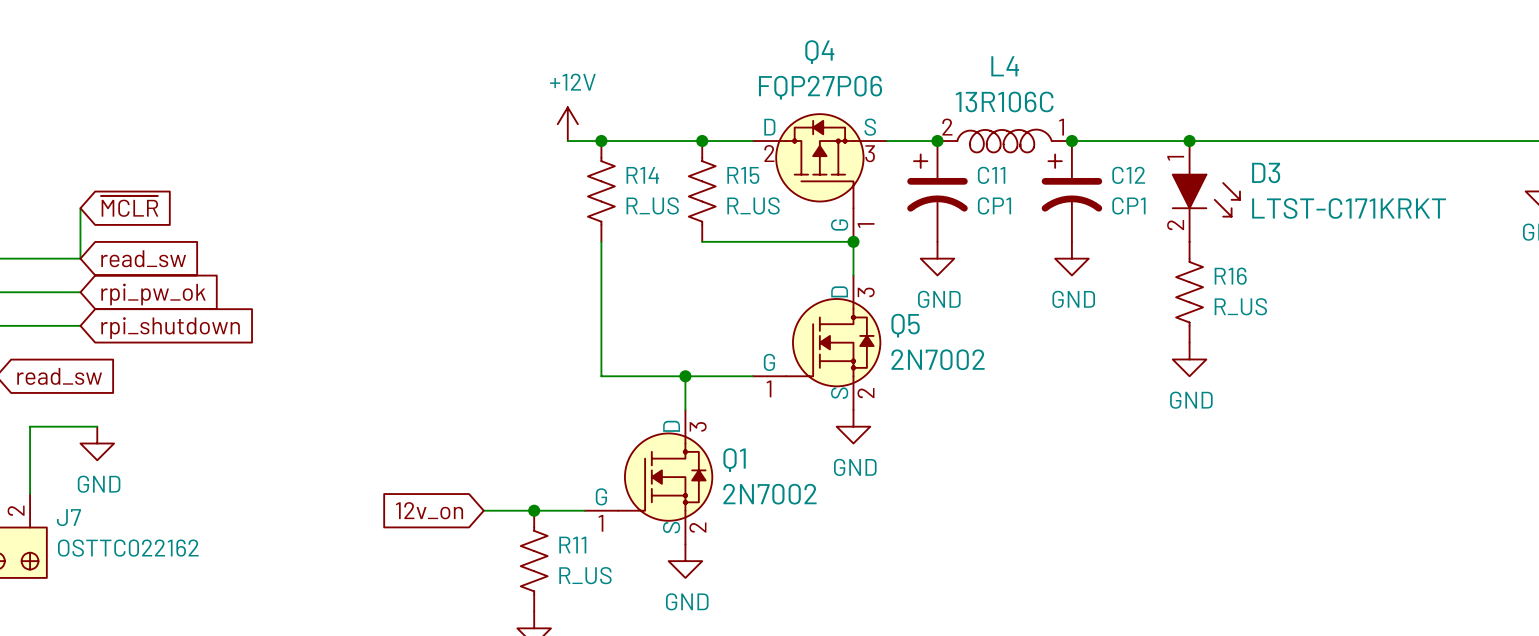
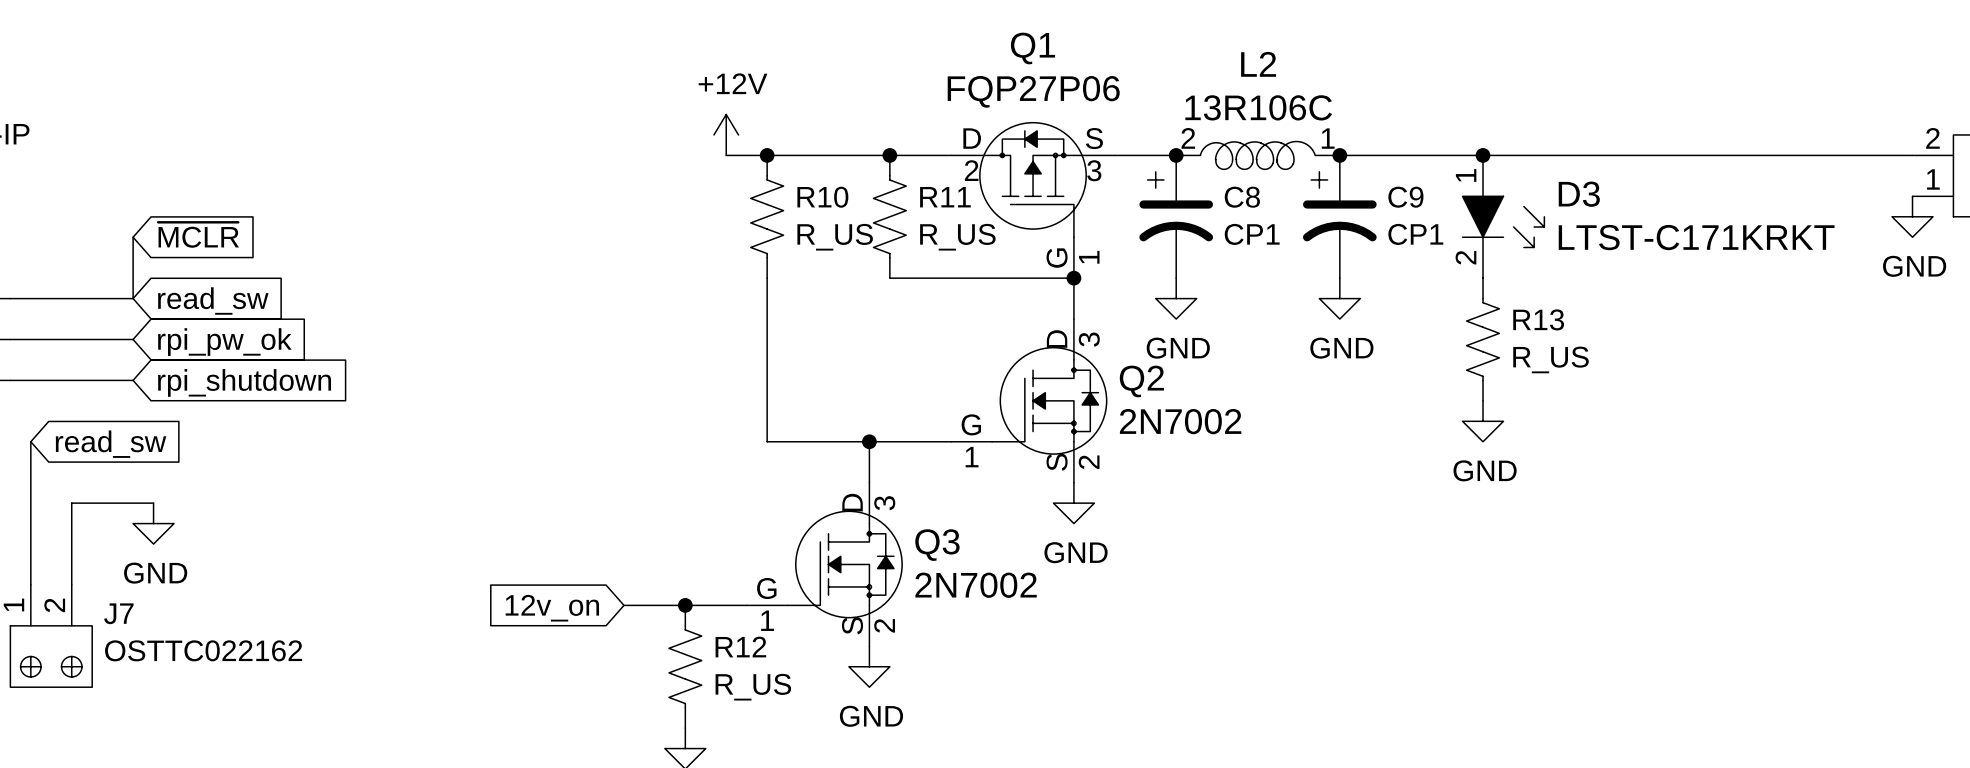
Q4 name: Q4 (819, 52) -> Q1 (1033, 48)
L4 name: L4 (1005, 66) -> L2 (1258, 64)
R14 name: R14 (642, 175) -> R10 (822, 197)
R15 name: R15 (743, 175) -> R11 (945, 197)
C11 name: C11 (991, 175) -> C8 (1242, 197)
C12 name: C12 (1128, 175) -> C9 (1405, 197)
R16 name: R16 (1230, 276) -> R13 (1538, 319)
Q5 name: Q5 (905, 325) -> Q2 (1141, 381)
Q1 name: Q1 (734, 460) -> Q3 (937, 545)
R11 name: R11 (572, 545) -> R12 (740, 647)

